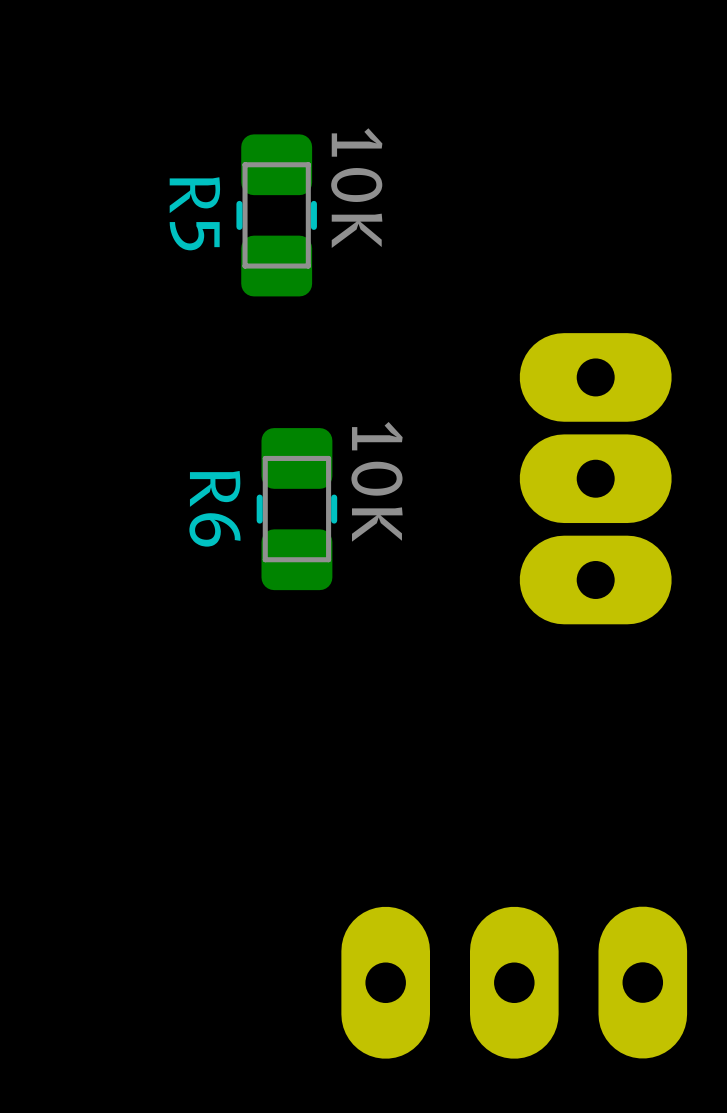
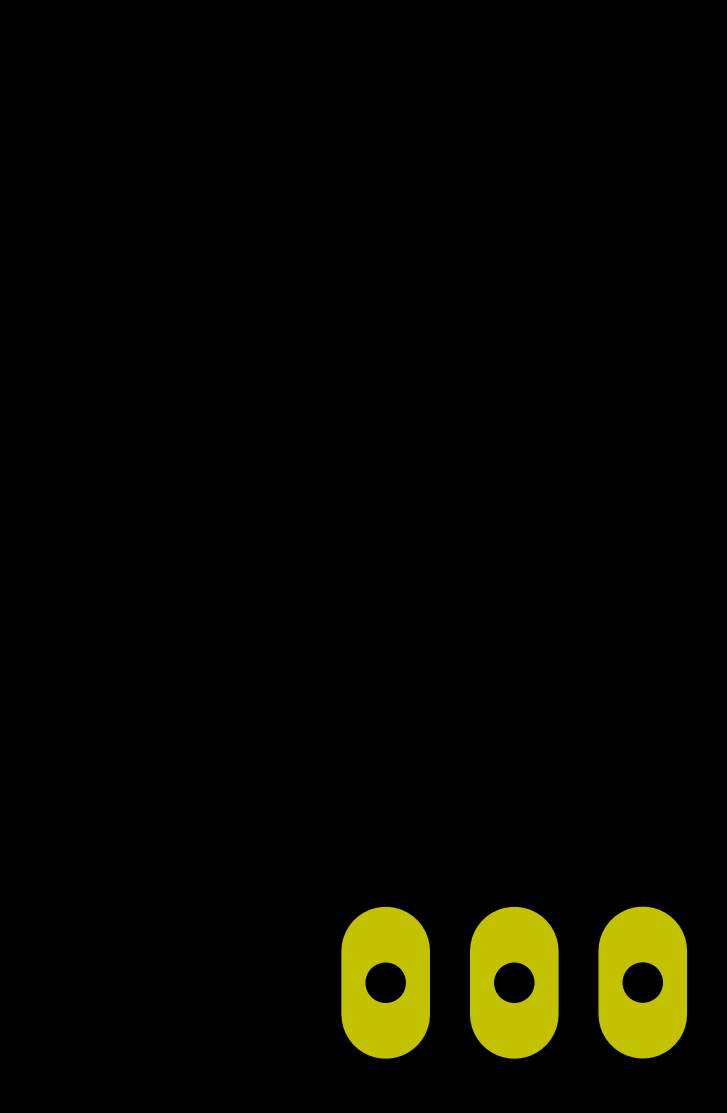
R5: 10K (276, 215) -> none
part: (595, 478) -> none
R6: 10K (296, 509) -> none

